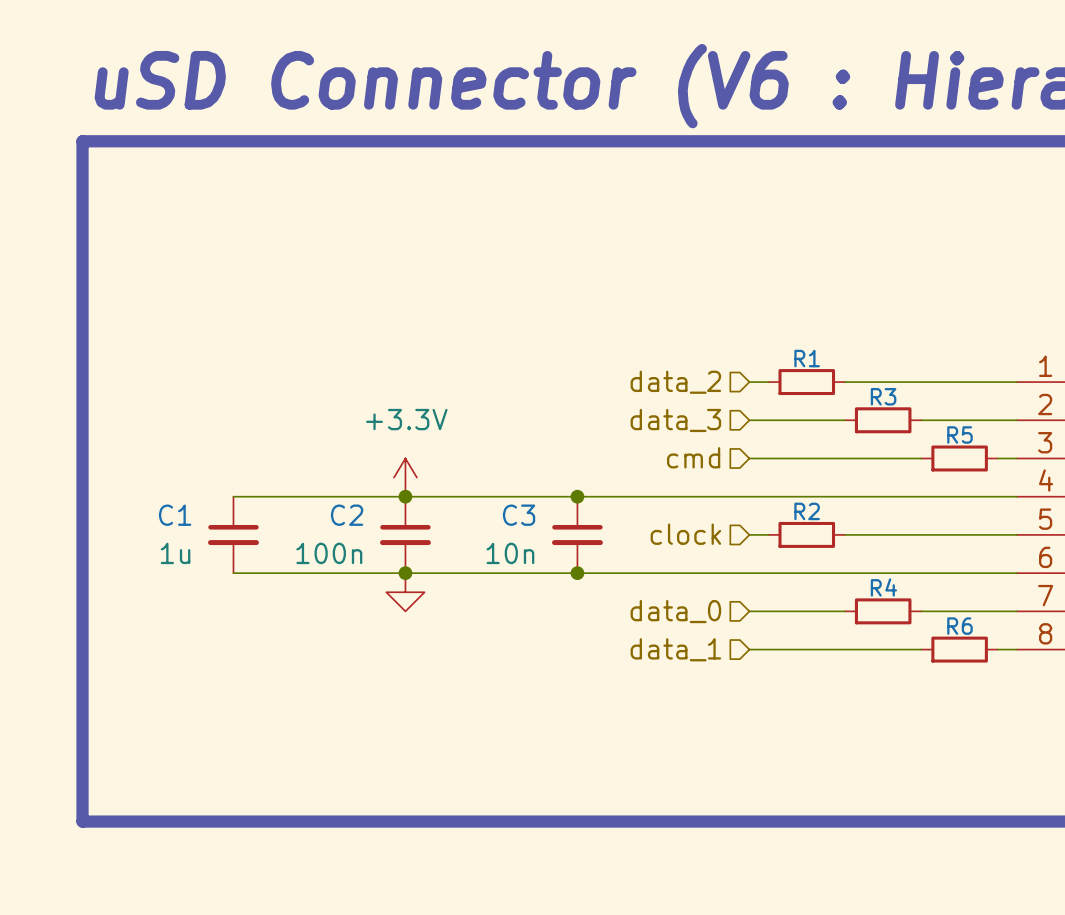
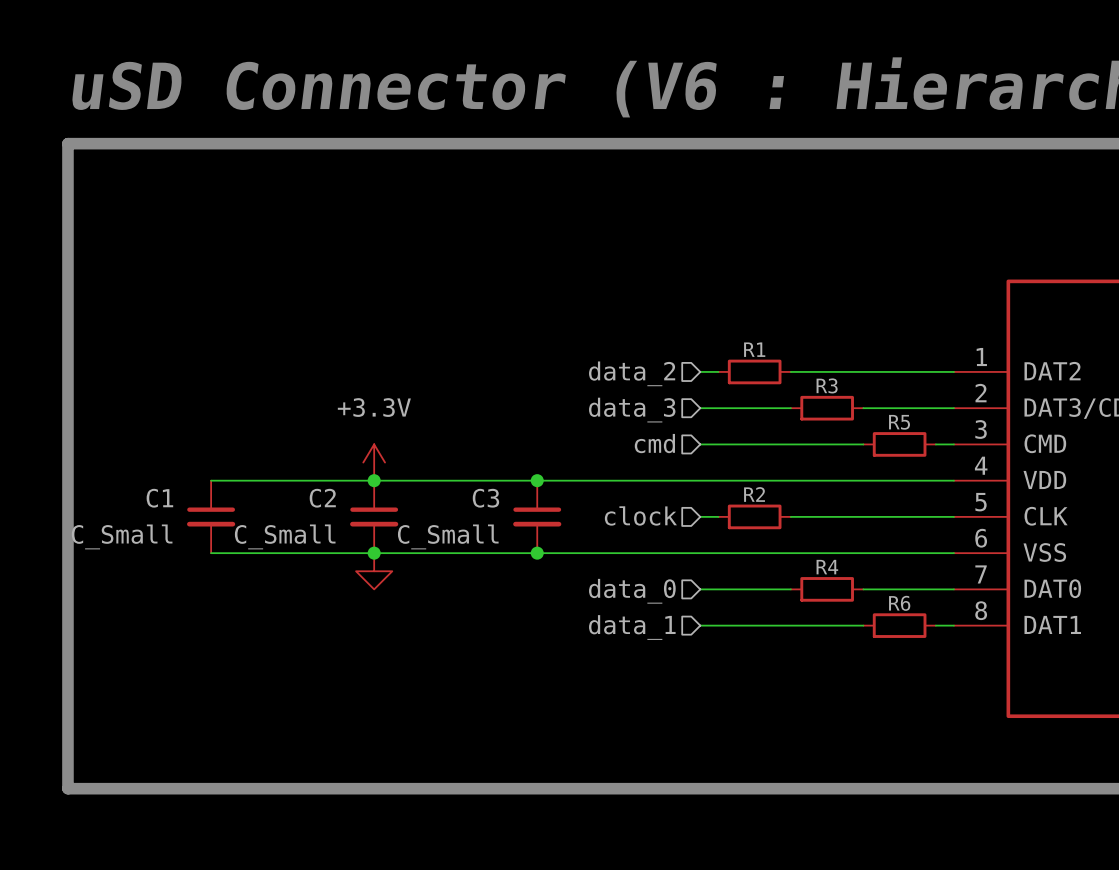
C1 value: 1u (175, 553) -> C_Small (122, 536)
C2 value: 100n (329, 553) -> C_Small (285, 536)
C3 value: 10n (510, 553) -> C_Small (448, 536)

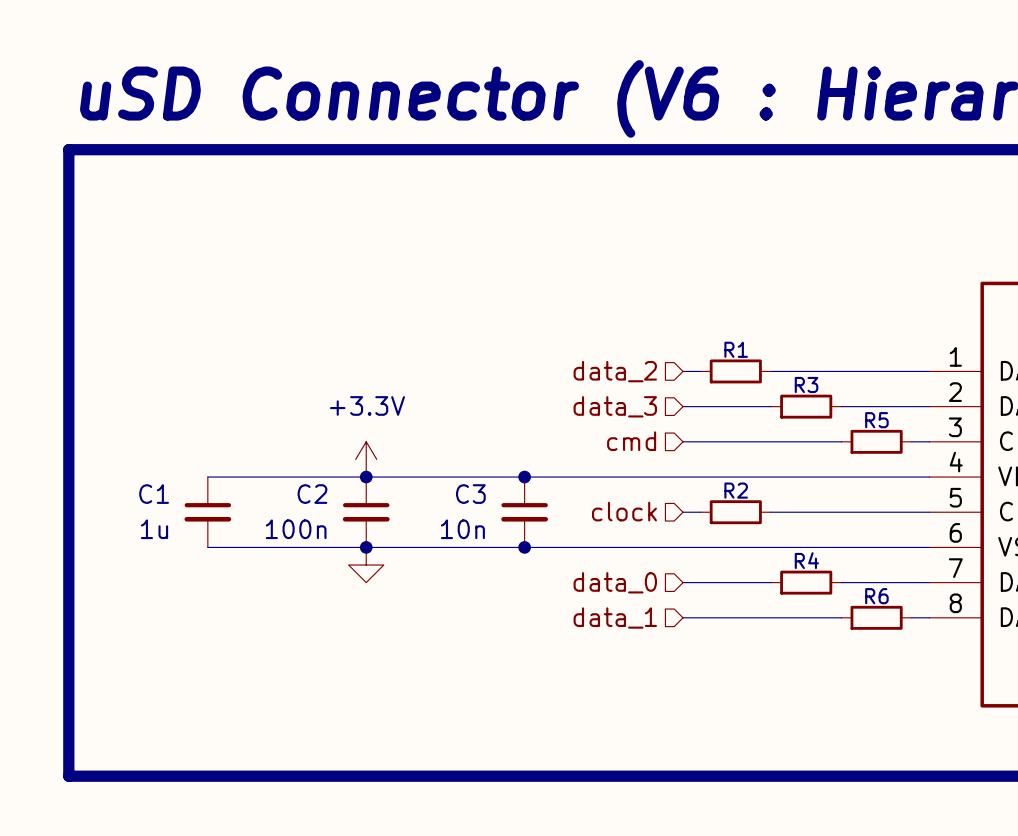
C1 value: C_Small (122, 536) -> 1u (154, 529)
C2 value: C_Small (285, 536) -> 100n (296, 529)
C3 value: C_Small (448, 536) -> 10n (462, 529)

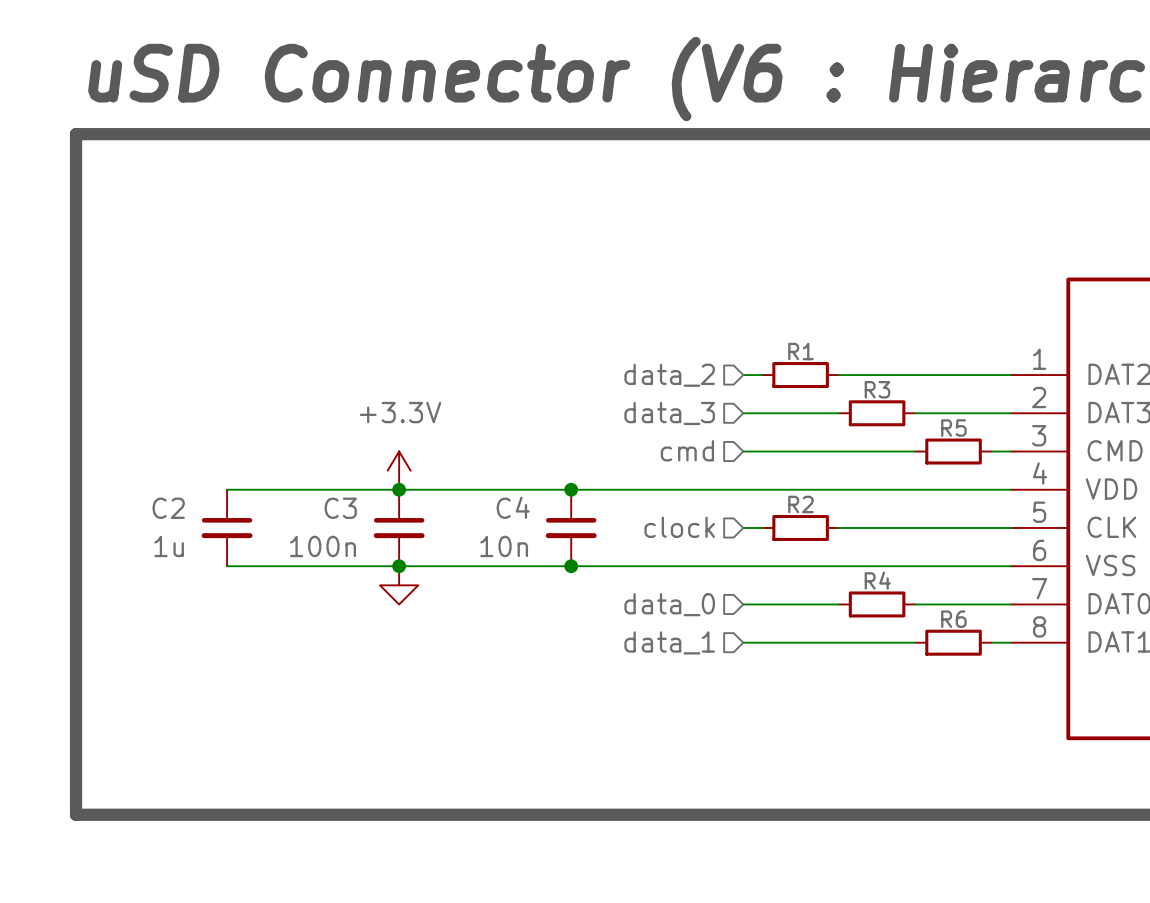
C1 name: C1 (154, 494) -> C2 (168, 508)
C2 name: C2 (312, 494) -> C3 (340, 508)
C3 name: C3 (470, 494) -> C4 (513, 507)

